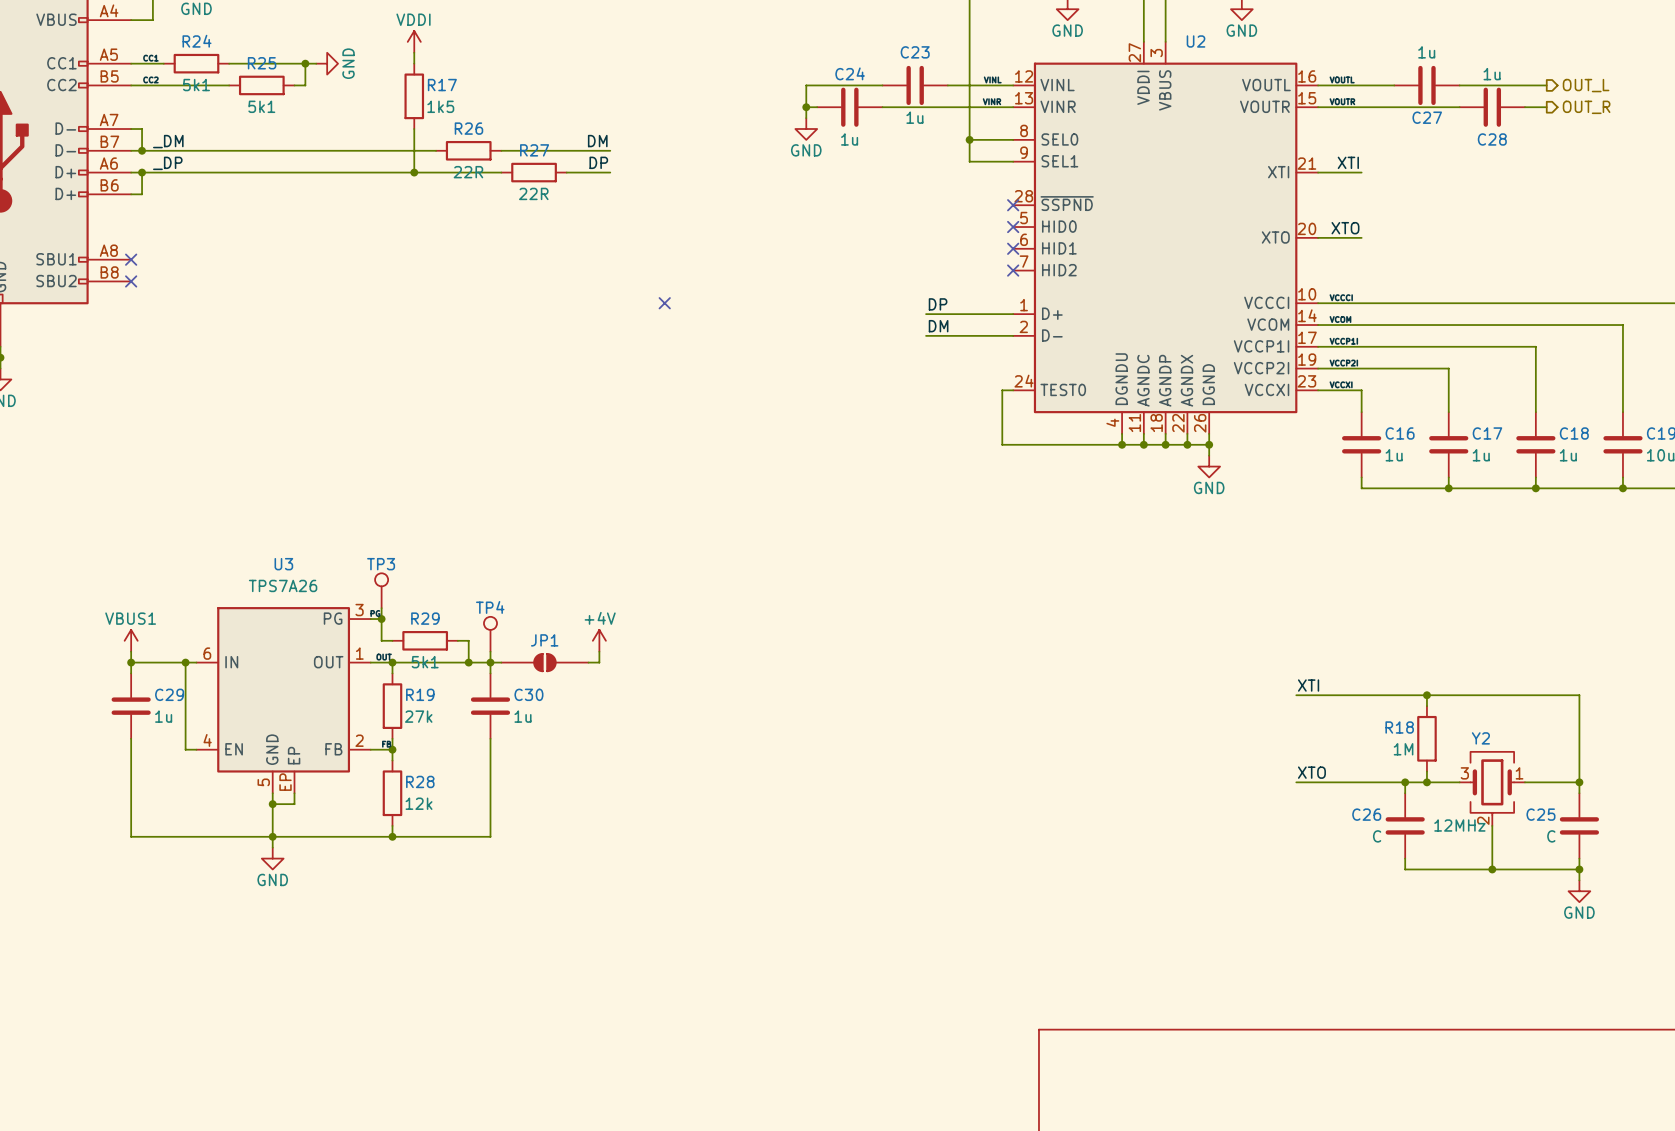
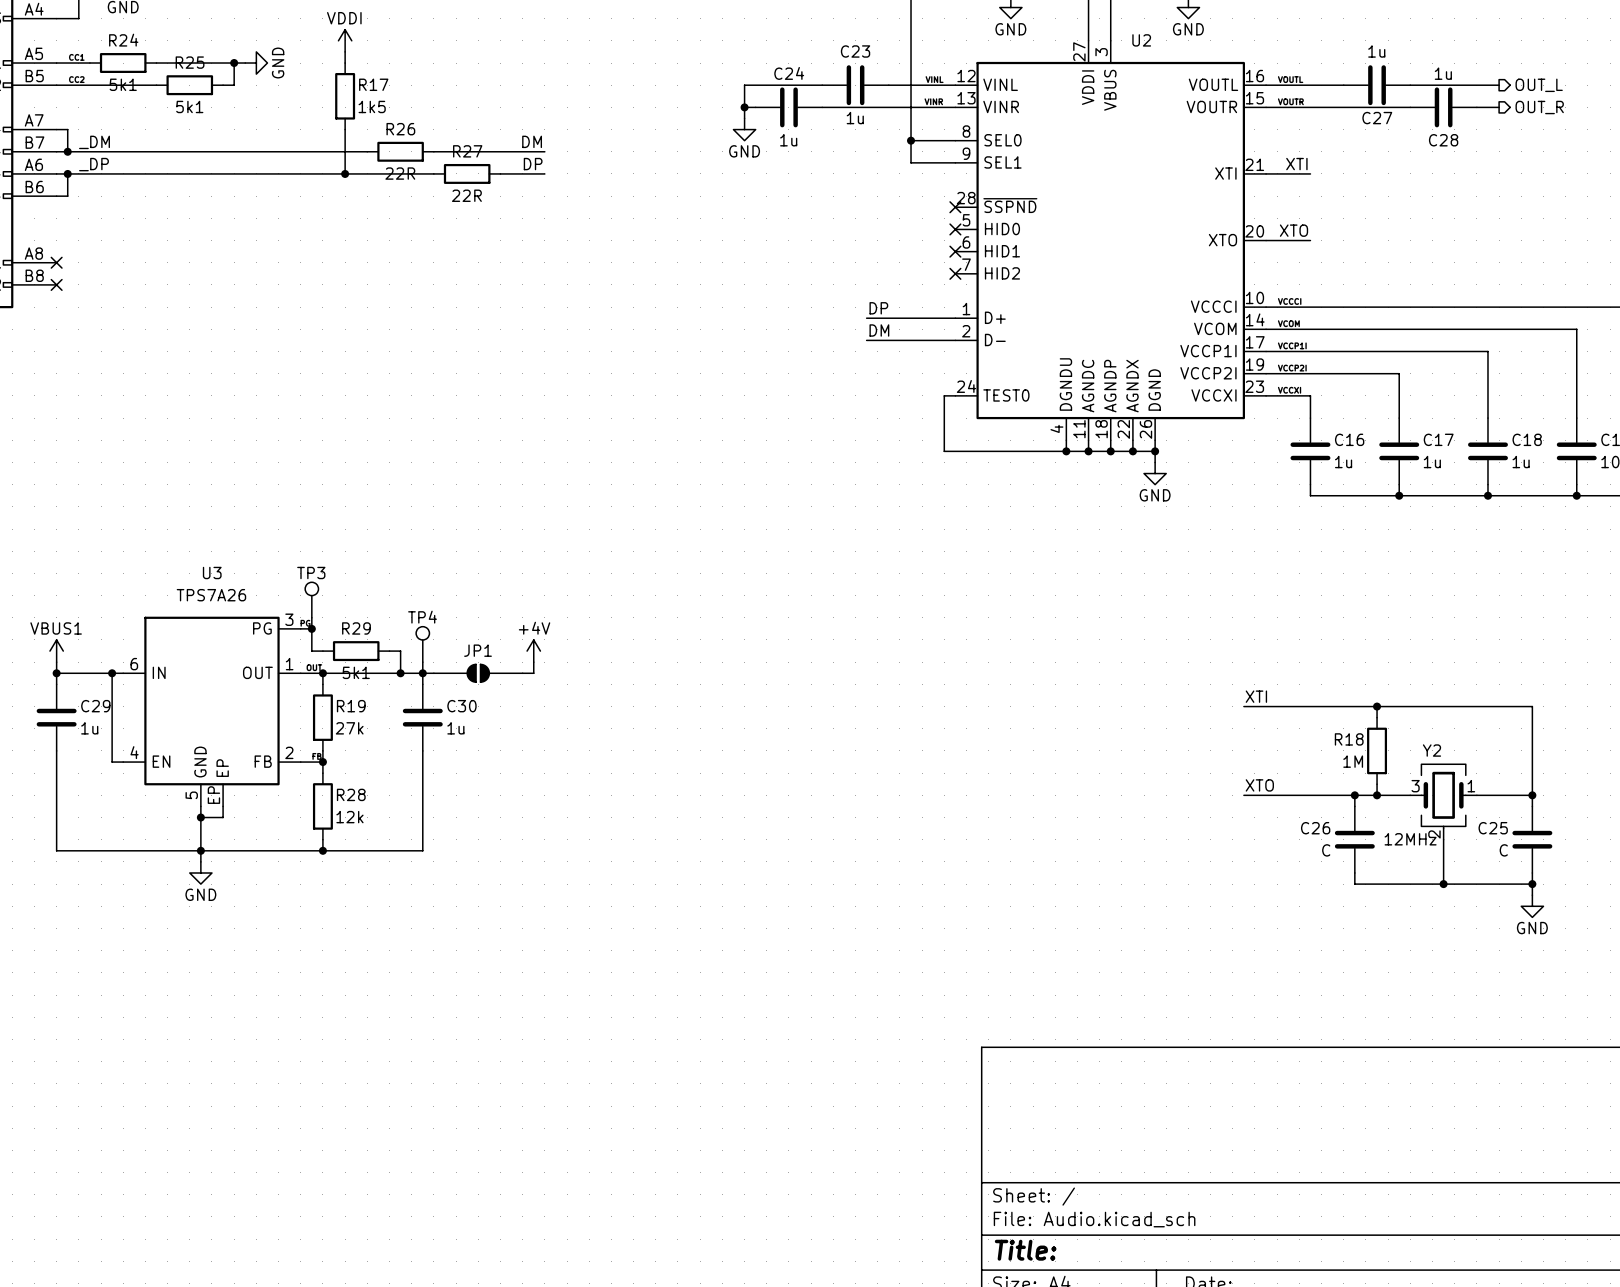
no-connect mark: (664, 303) -> none

